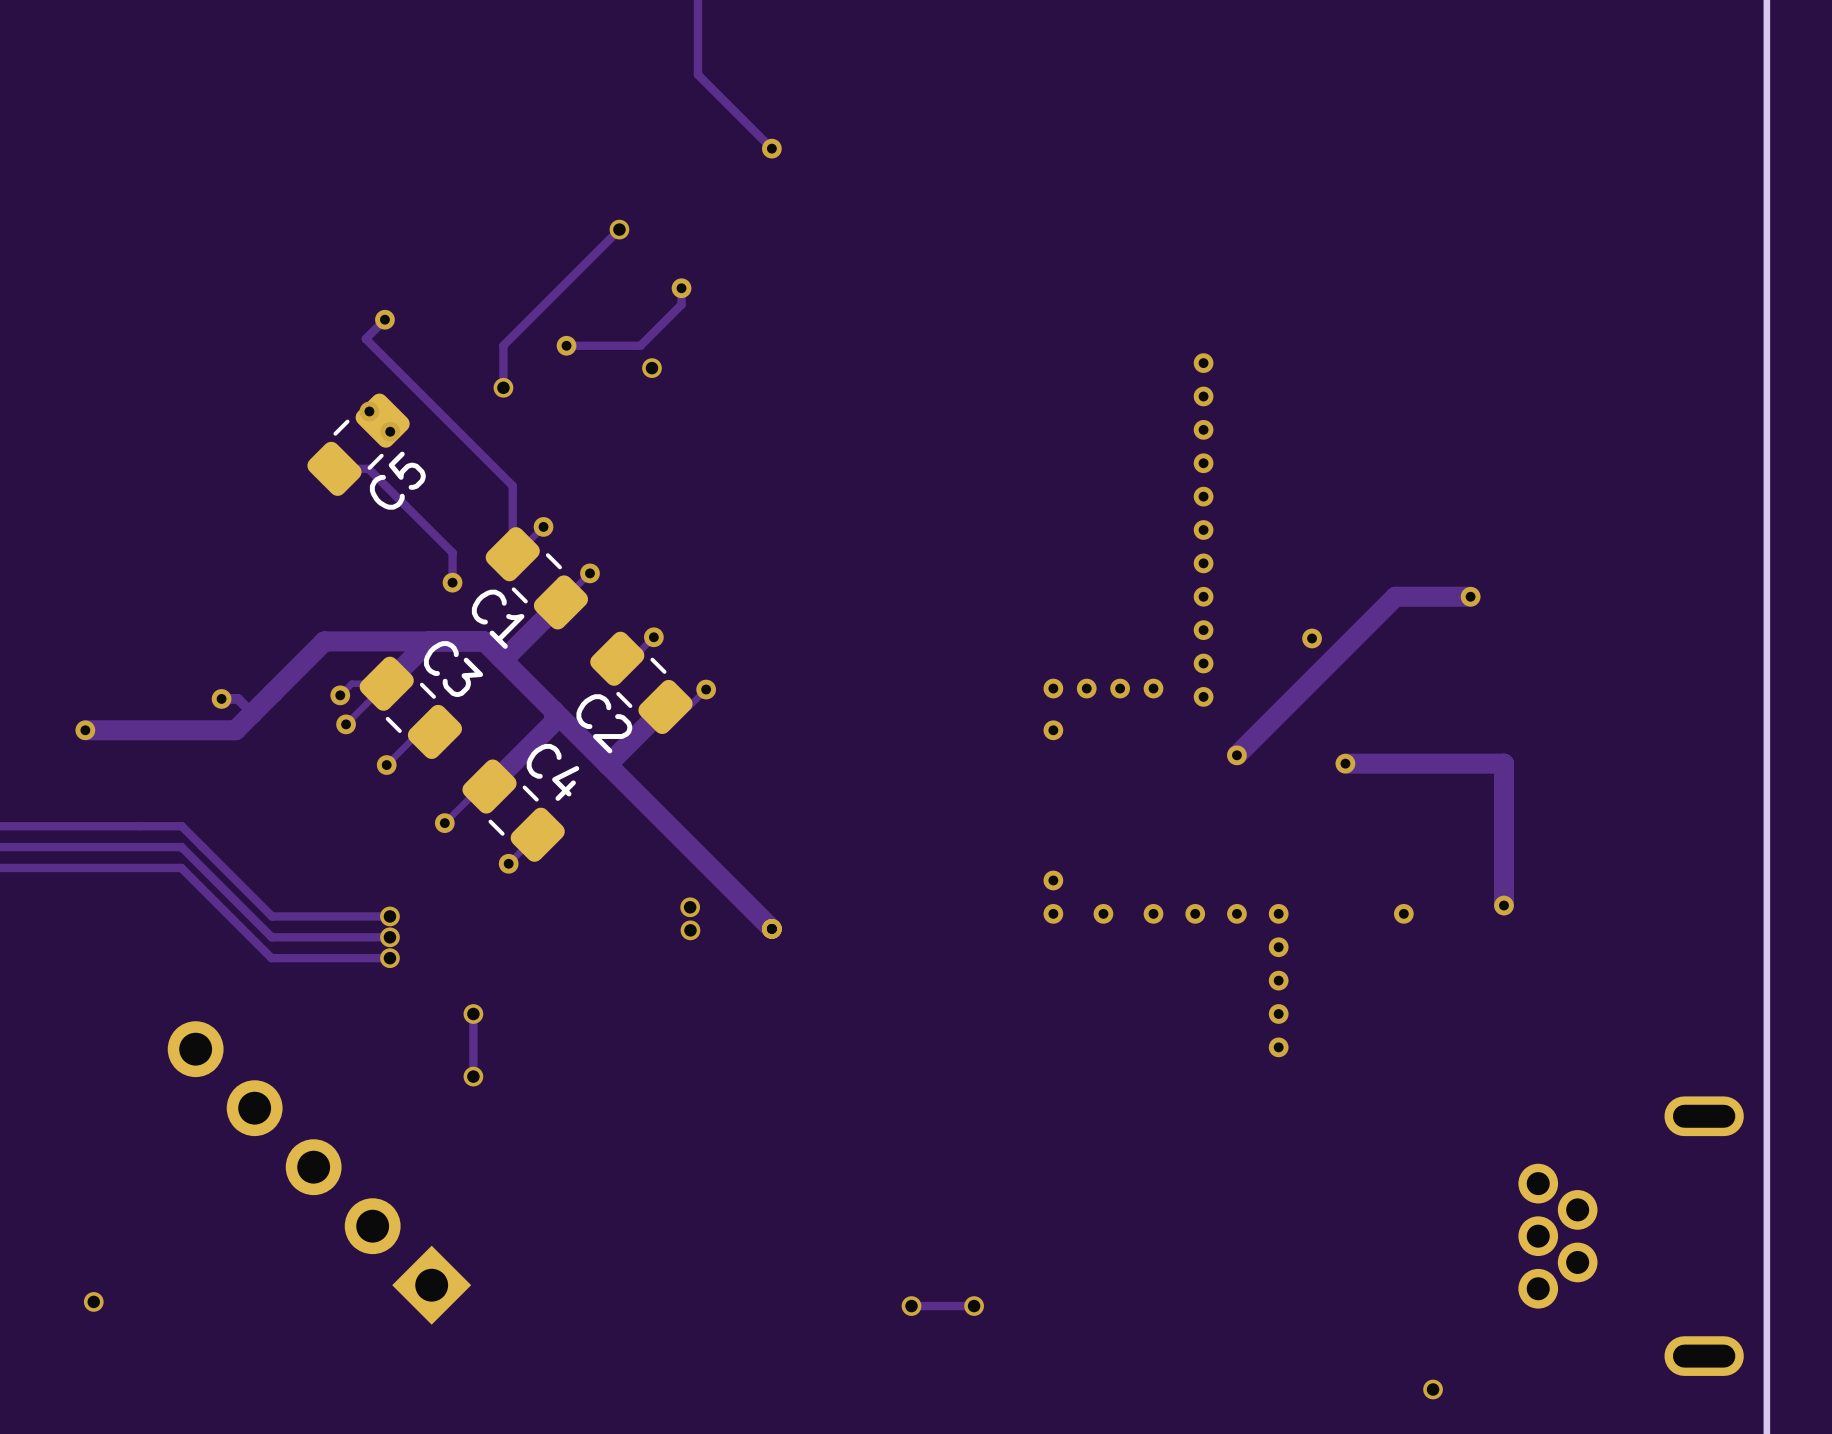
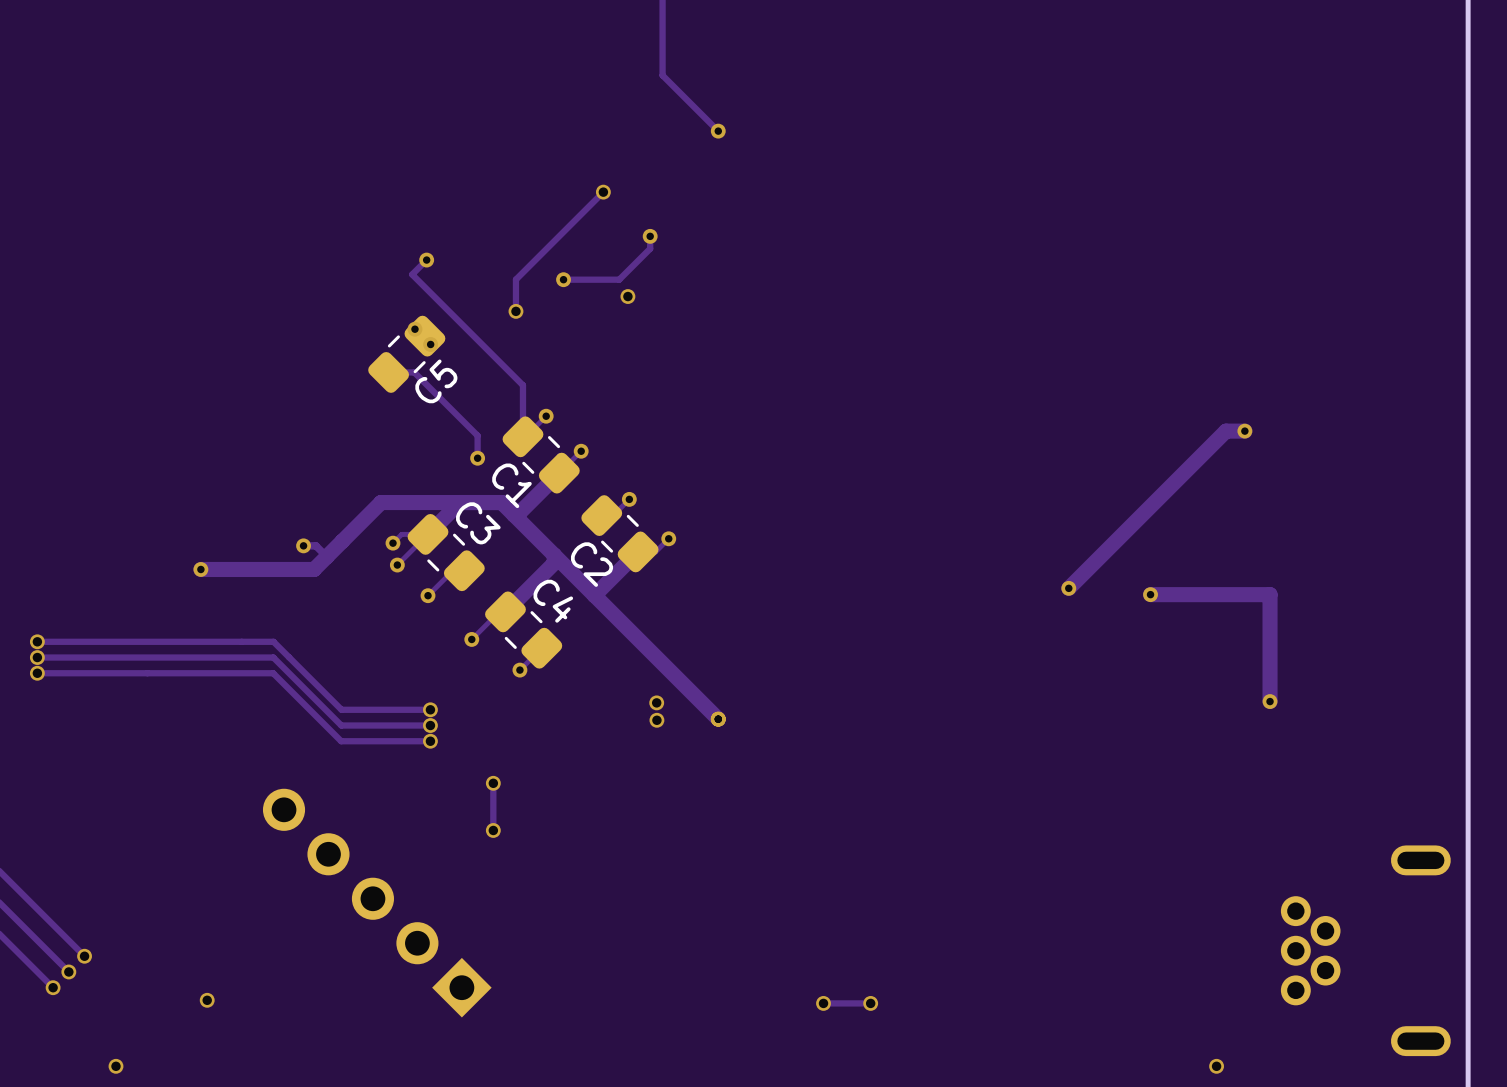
via: (1203, 363) -> none
via: (1203, 396) -> none
via: (1203, 429) -> none
via: (1203, 463) -> none
via: (1203, 496) -> none
via: (1203, 529) -> none
via: (1203, 563) -> none
via: (1203, 596) -> none
track: (1470, 596) (1395, 596) -> (1244, 431) (1226, 431) (1188, 468)
via position: (1470, 596) -> (1244, 431)
via: (1203, 630) -> none
via: (1312, 638) -> none
via: (1203, 663) -> none
via: (1053, 688) -> none
via: (1086, 688) -> none
via: (1120, 688) -> none
via: (1153, 688) -> none
via: (1203, 696) -> none
via: (1053, 730) -> none
via: (1053, 880) -> none
via: (1053, 913) -> none
via: (1103, 913) -> none
via: (1153, 913) -> none
via: (1195, 913) -> none
via: (1236, 913) -> none
via: (1278, 913) -> none
via: (1403, 913) -> none
via: (1278, 947) -> none
via: (1278, 980) -> none
via: (1278, 1013) -> none
via: (1278, 1047) -> none

